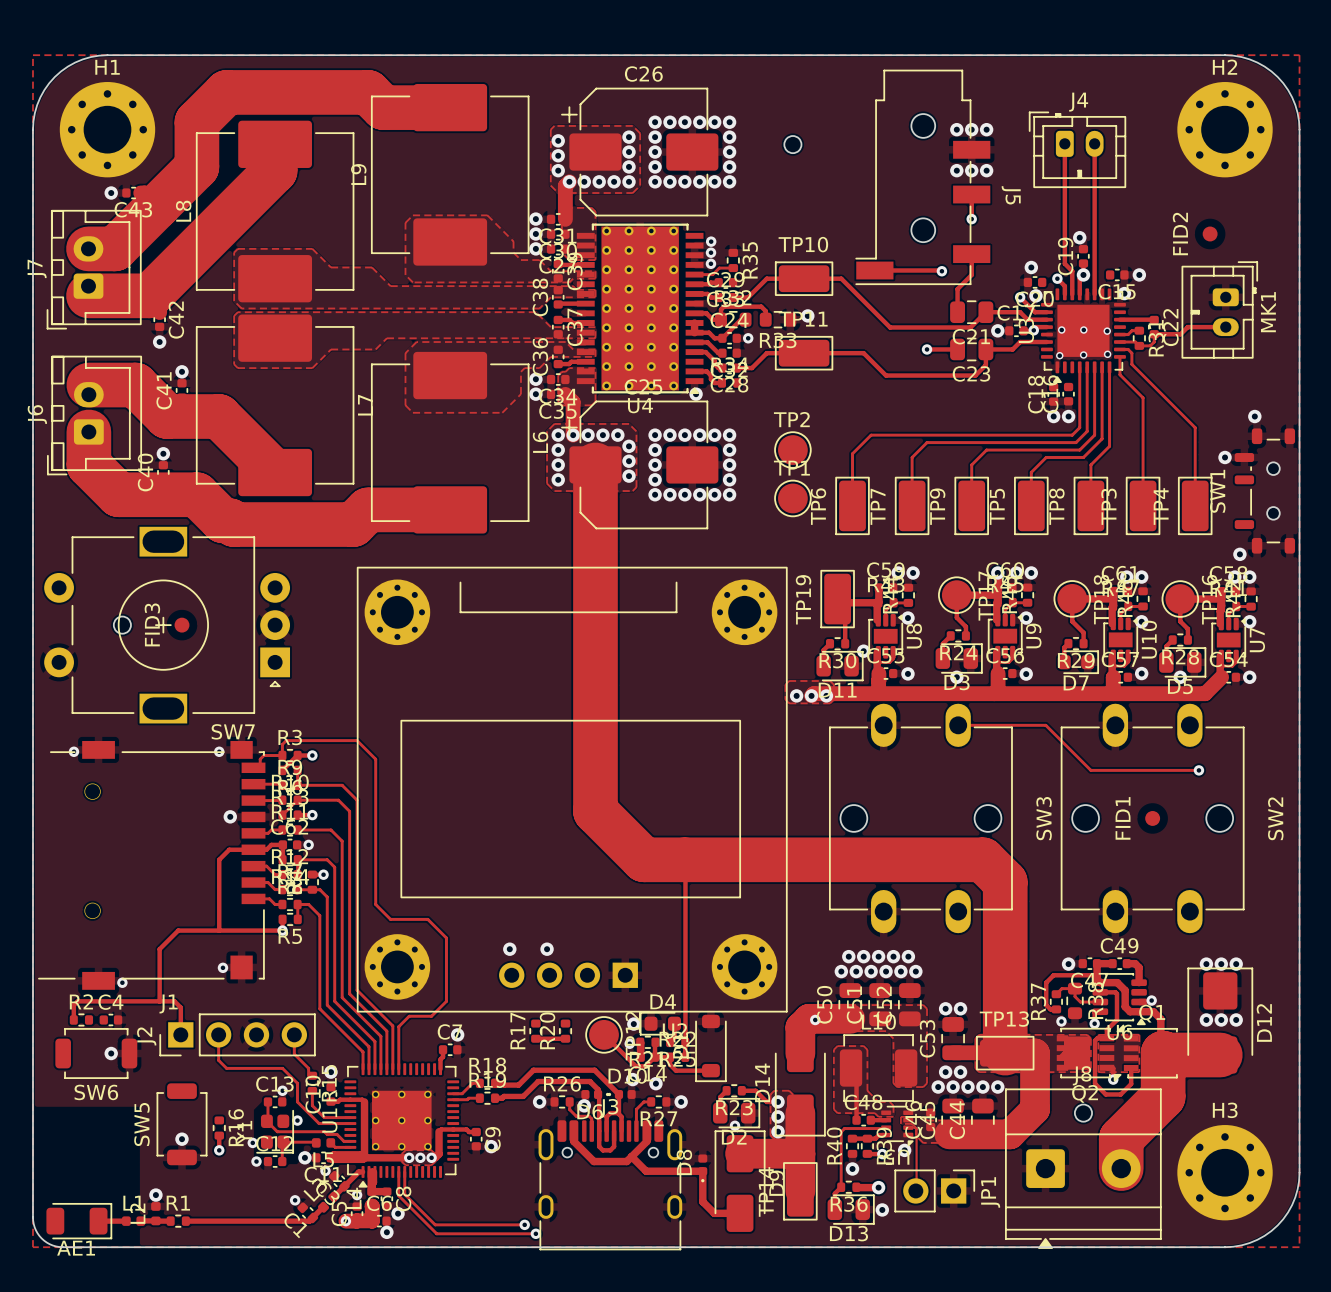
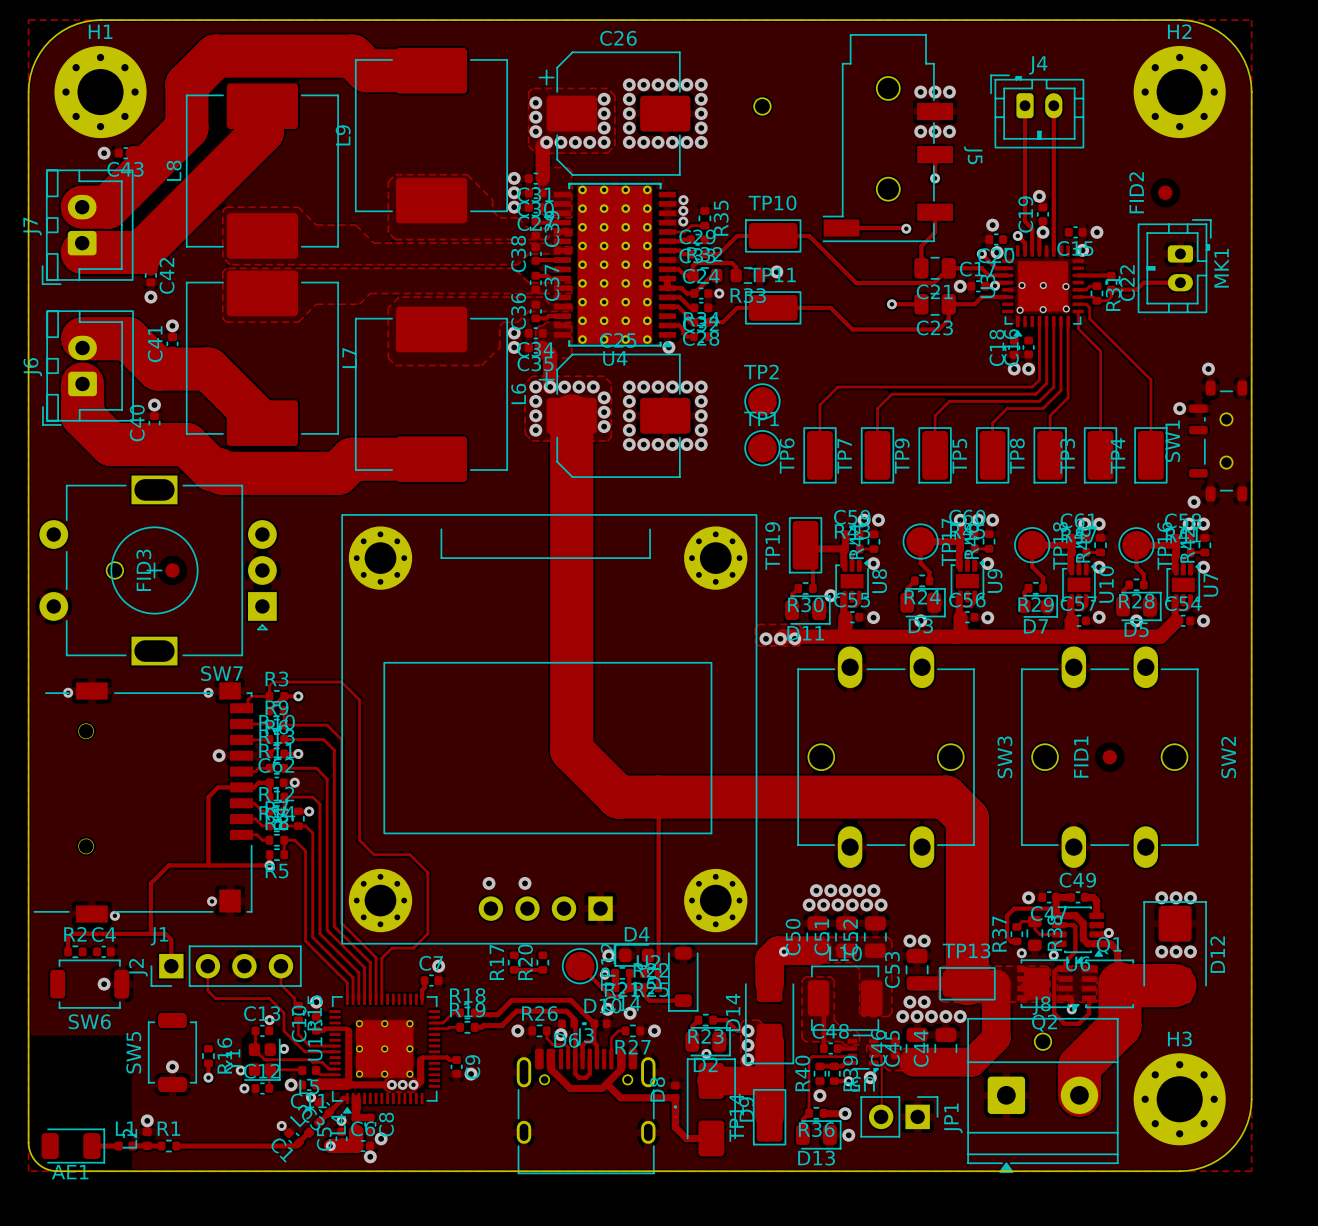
track: (958, 725) (1045, 725) (1090, 770) (1198, 770) -> none
via: (1198, 770) -> none
track: (398, 1171) (398, 1195) (436, 1233) (535, 1233) -> none
track: (404, 1171) (404, 1194) (435, 1224) (524, 1224) -> none
via: (524, 1224) -> none
via: (535, 1233) -> none

